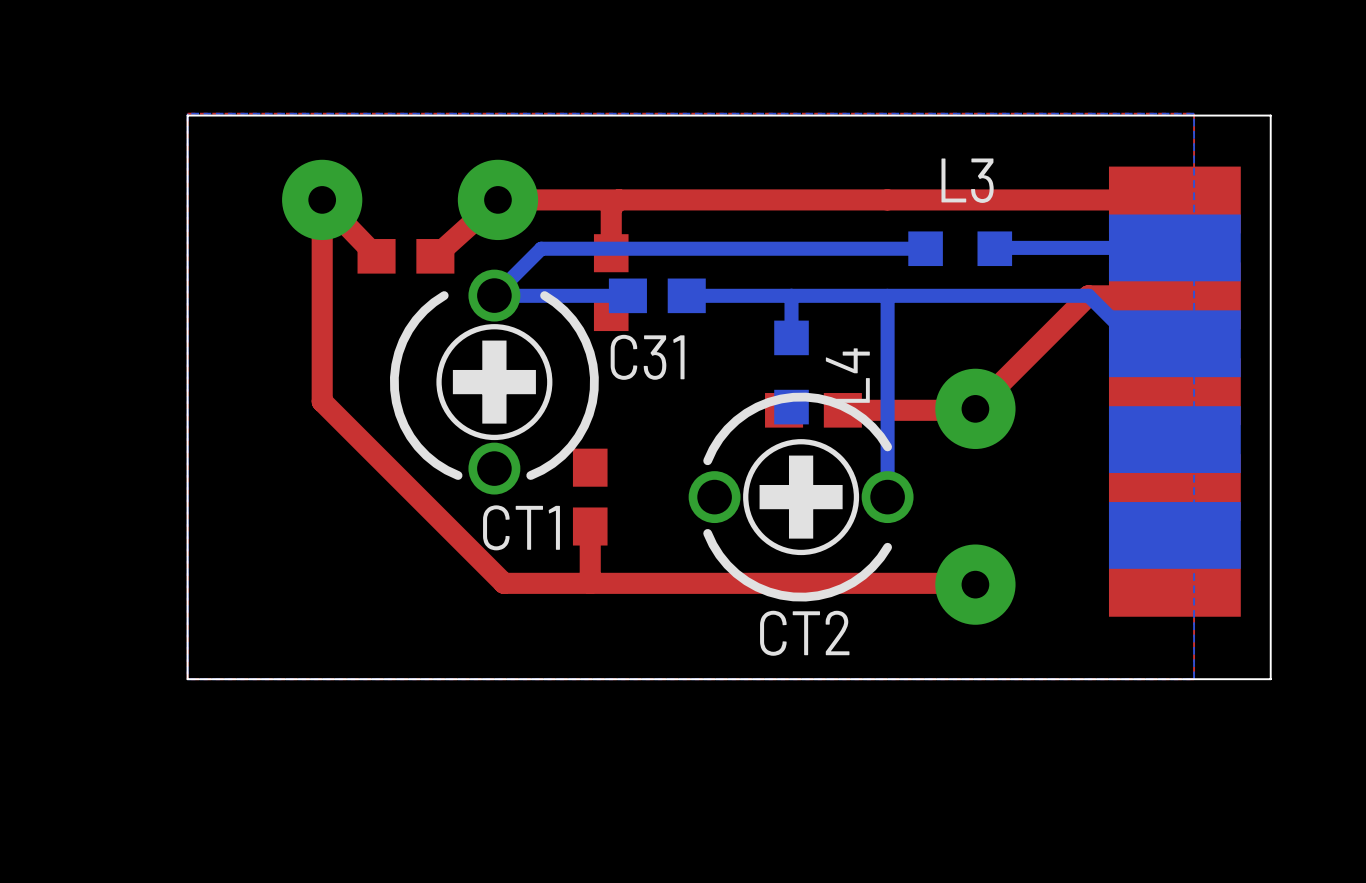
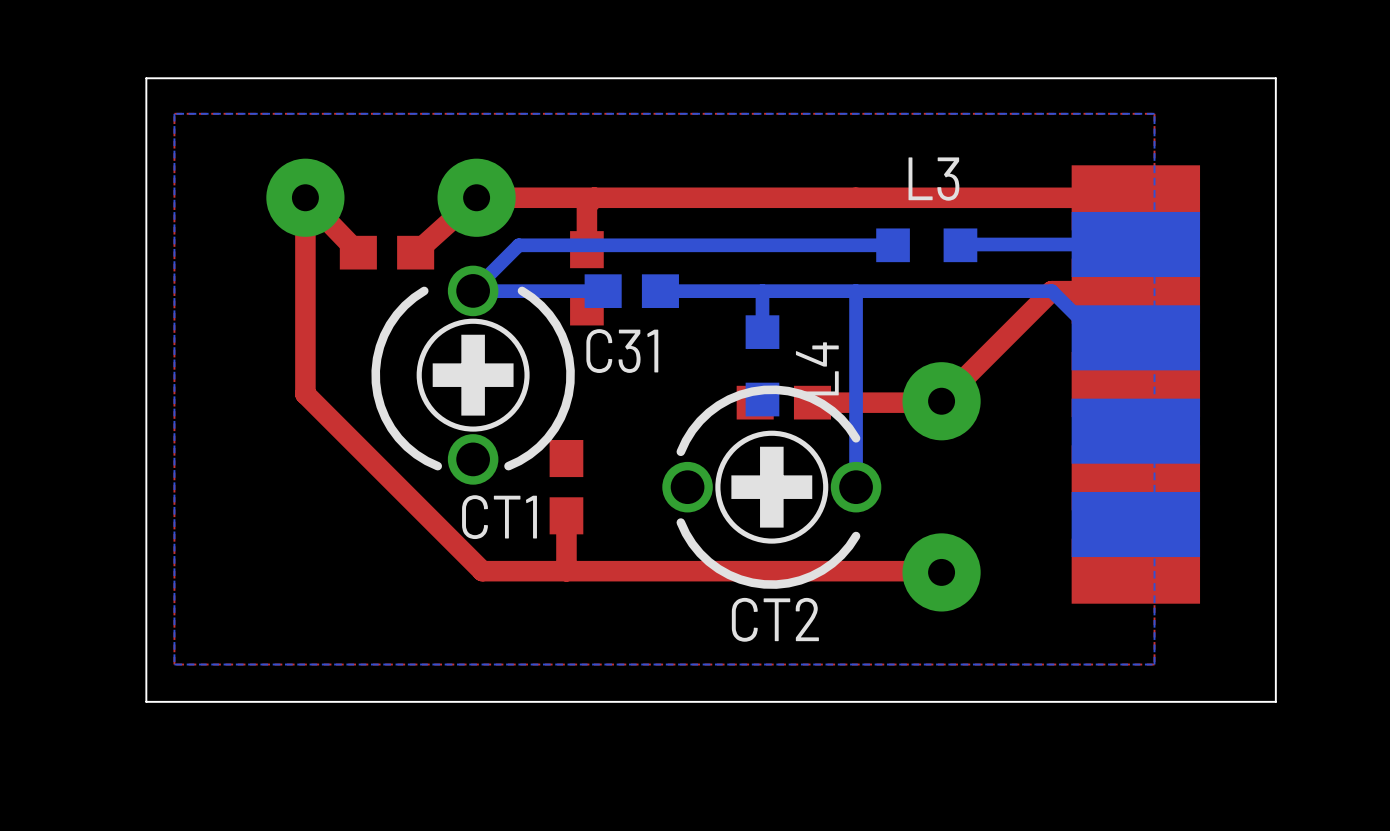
board edge: (1270, 115) (187, 115) (187, 679) (1270, 679) (1270, 115) -> (1275, 78) (1275, 701) (146, 701) (146, 78) (1275, 78)

